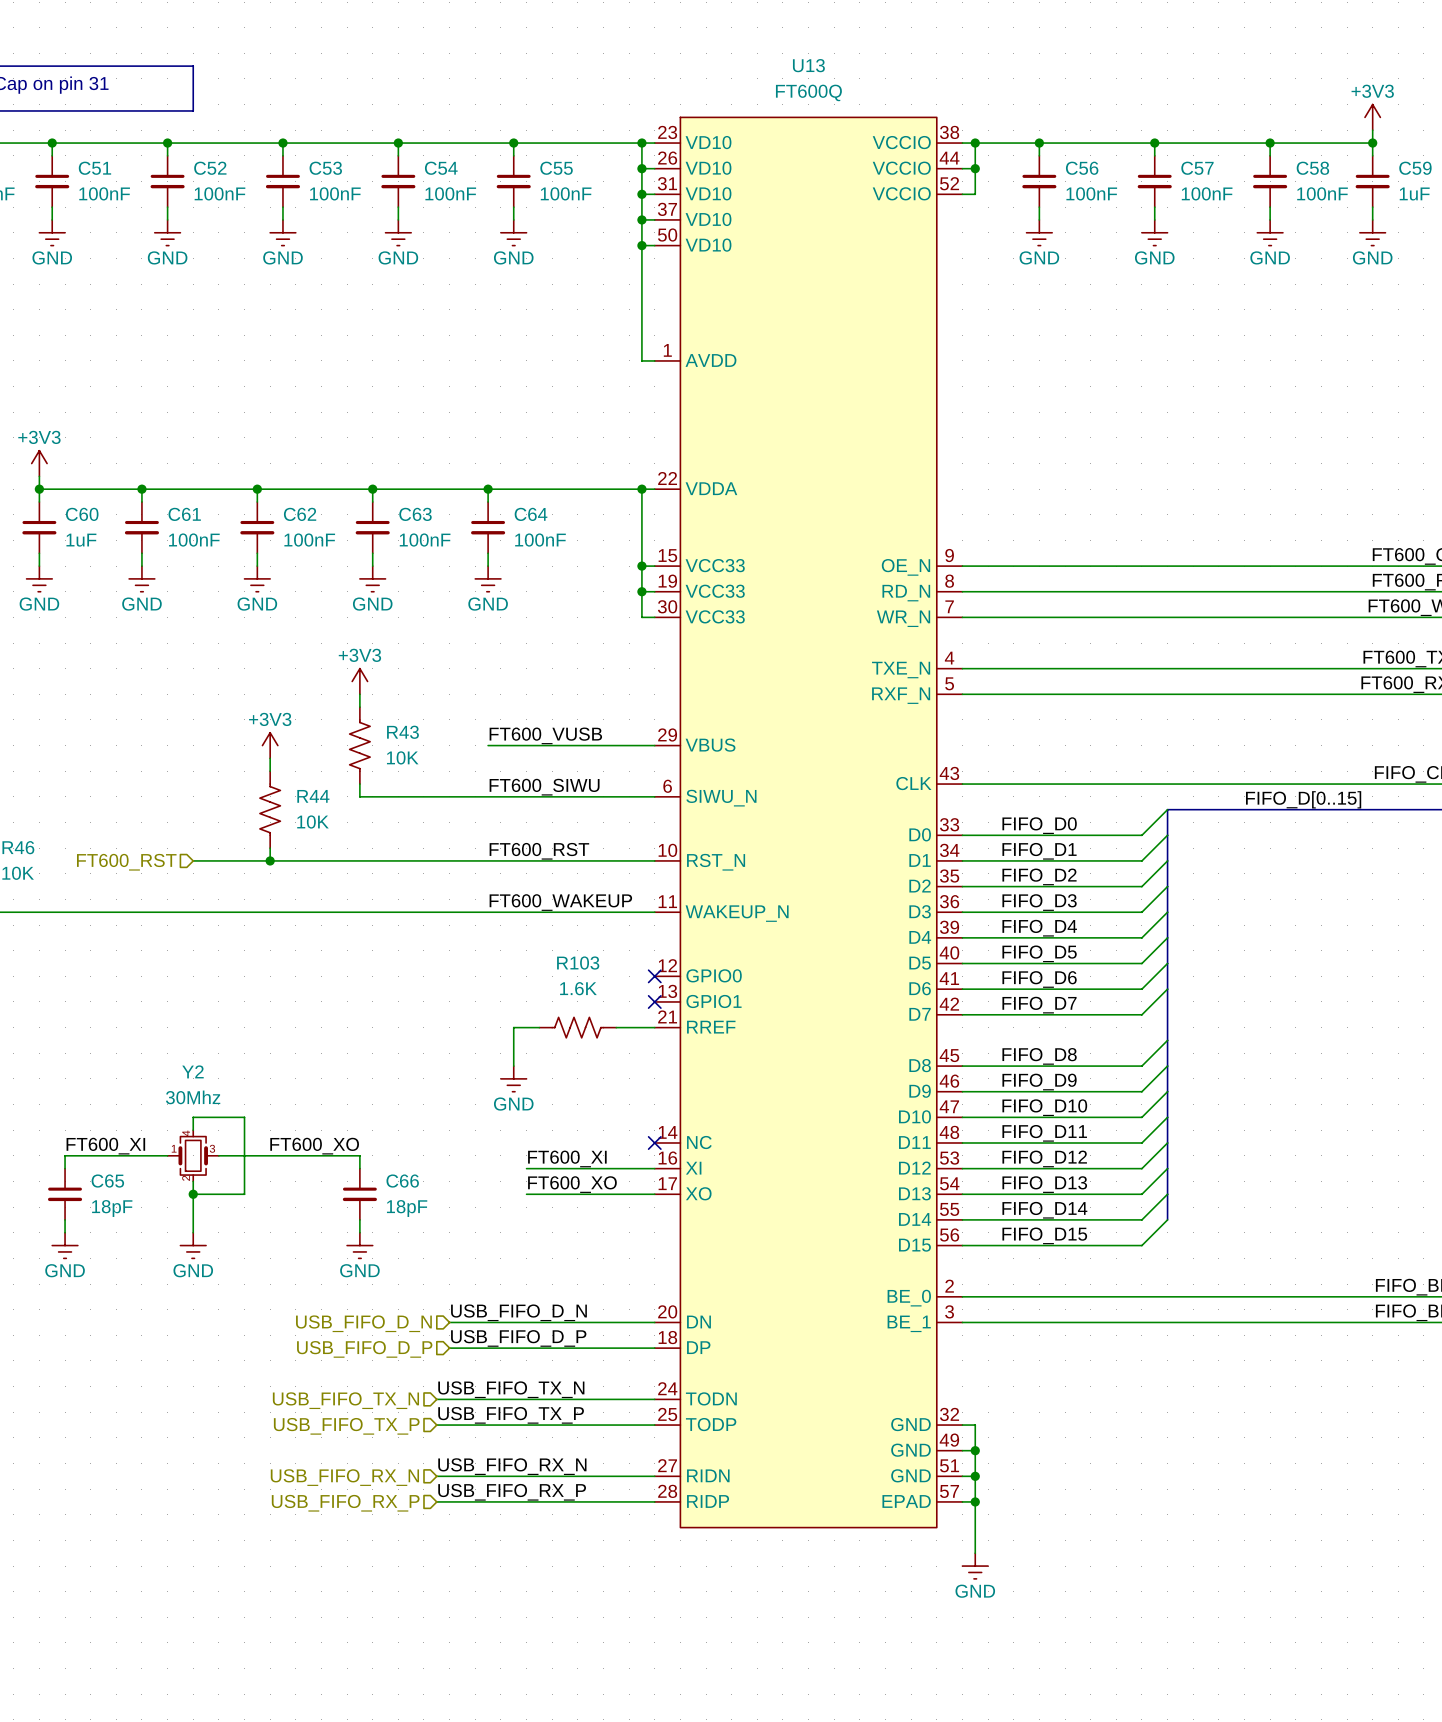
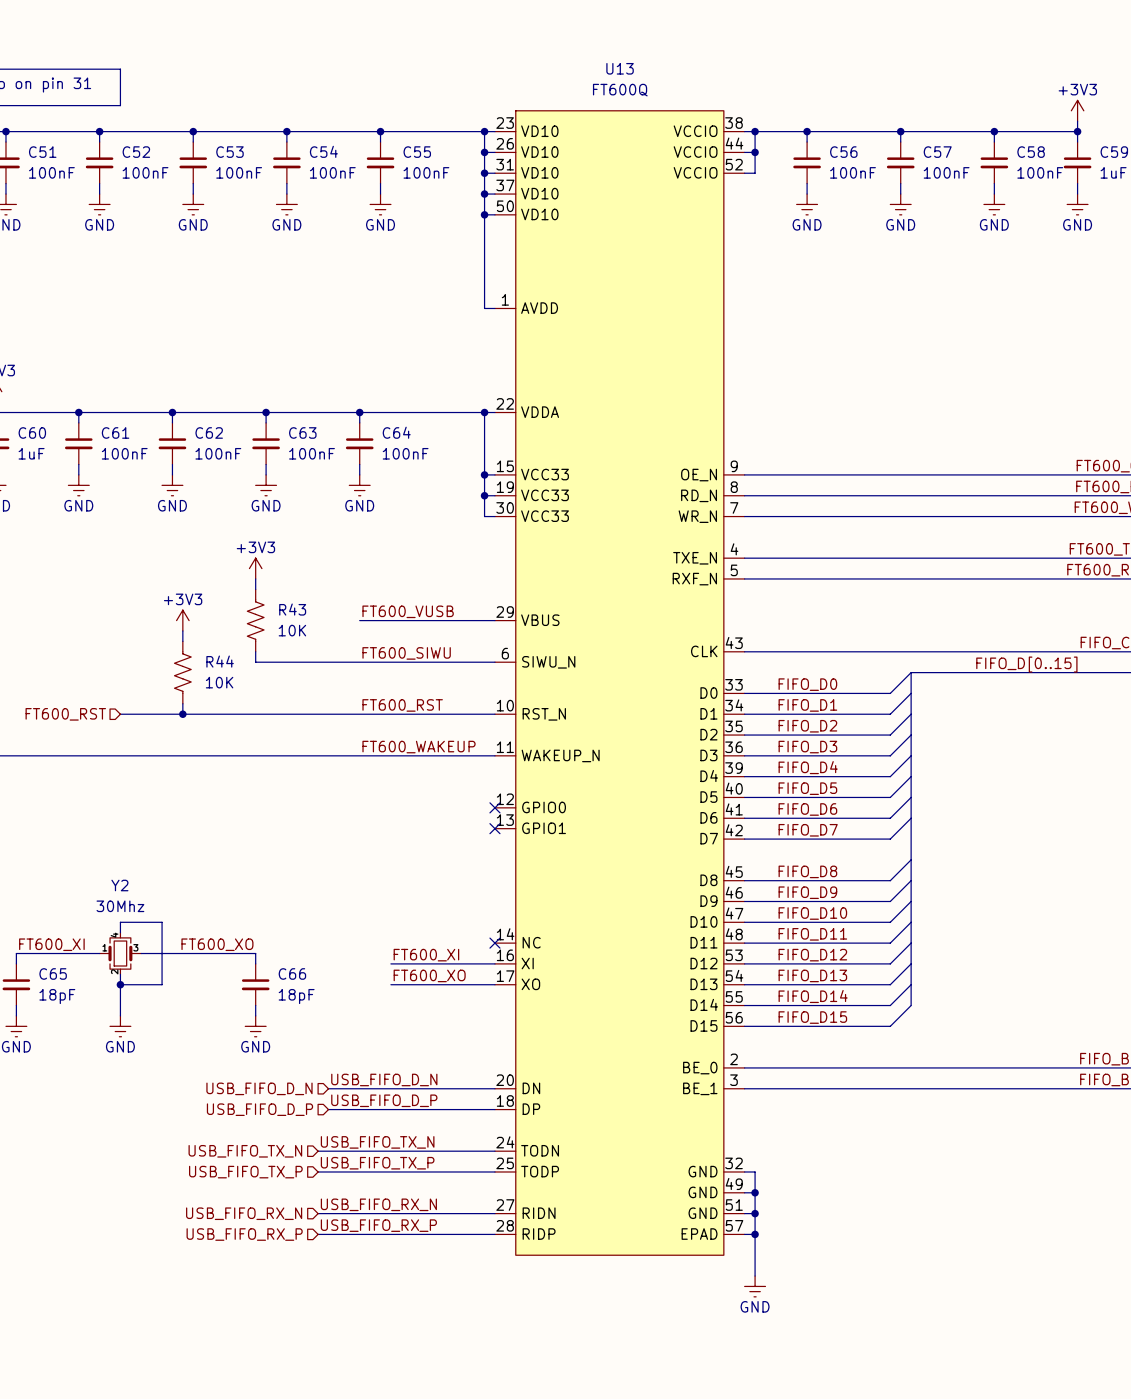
U13 symbol: [654, 117, 963, 1528] -> [494, 110, 745, 1256]
wire: (539, 1027) (513, 1027) (513, 1066) -> none
R103: 1.6K (577, 1027) -> none
wire: (616, 1027) (654, 1027) -> none
power symbol: GND (513, 1078) -> none

